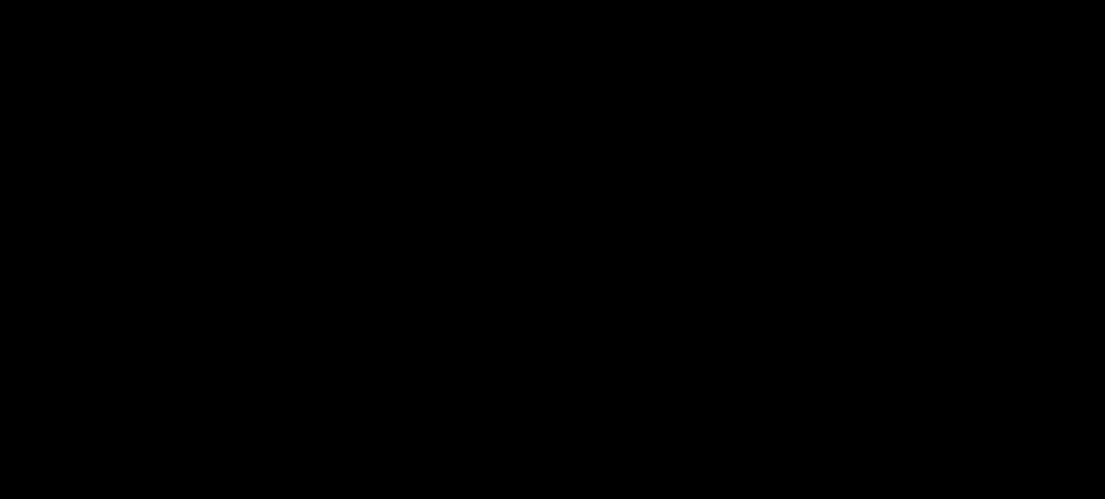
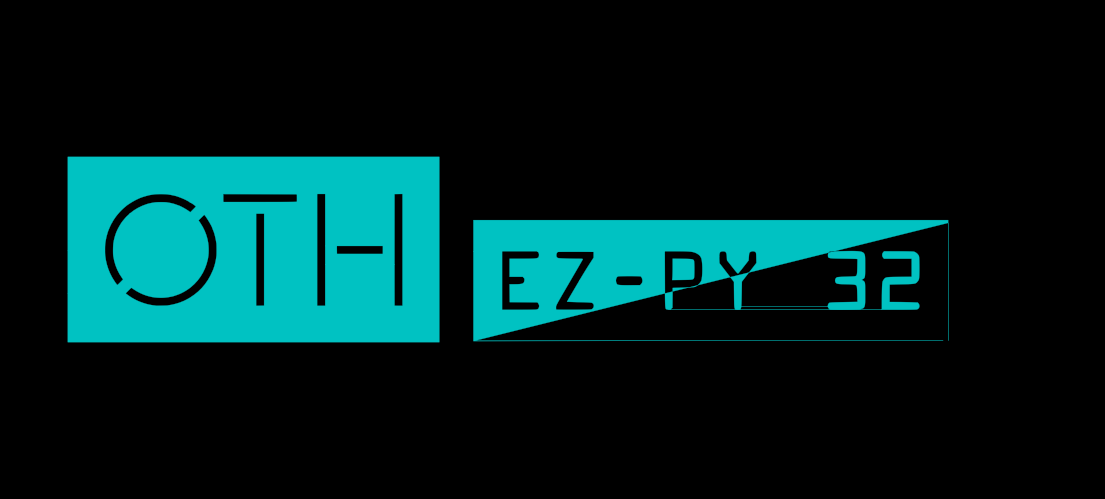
drawing: none -> [67, 156, 440, 343]
drawing: none -> [473, 219, 949, 342]

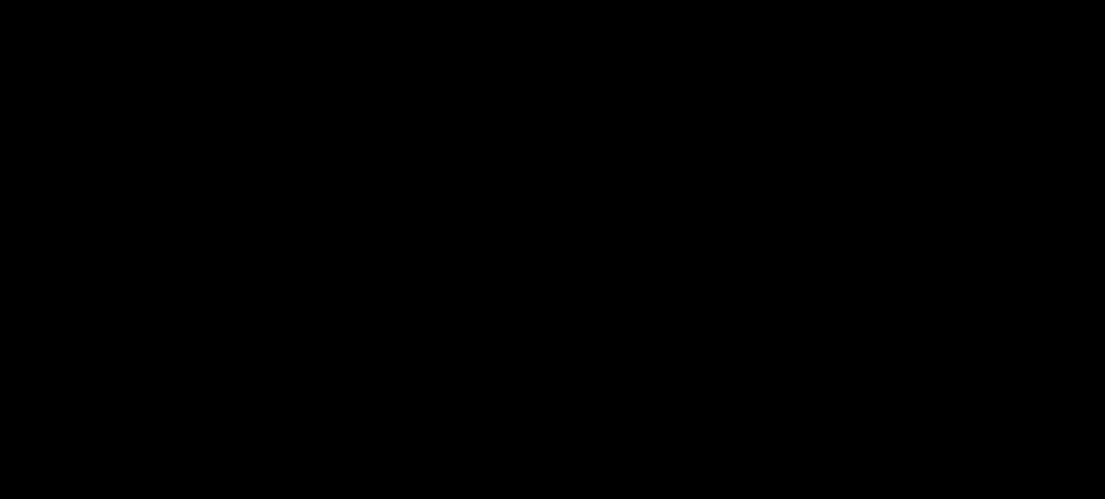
drawing: [67, 156, 440, 343] -> none
drawing: [473, 219, 949, 342] -> none

